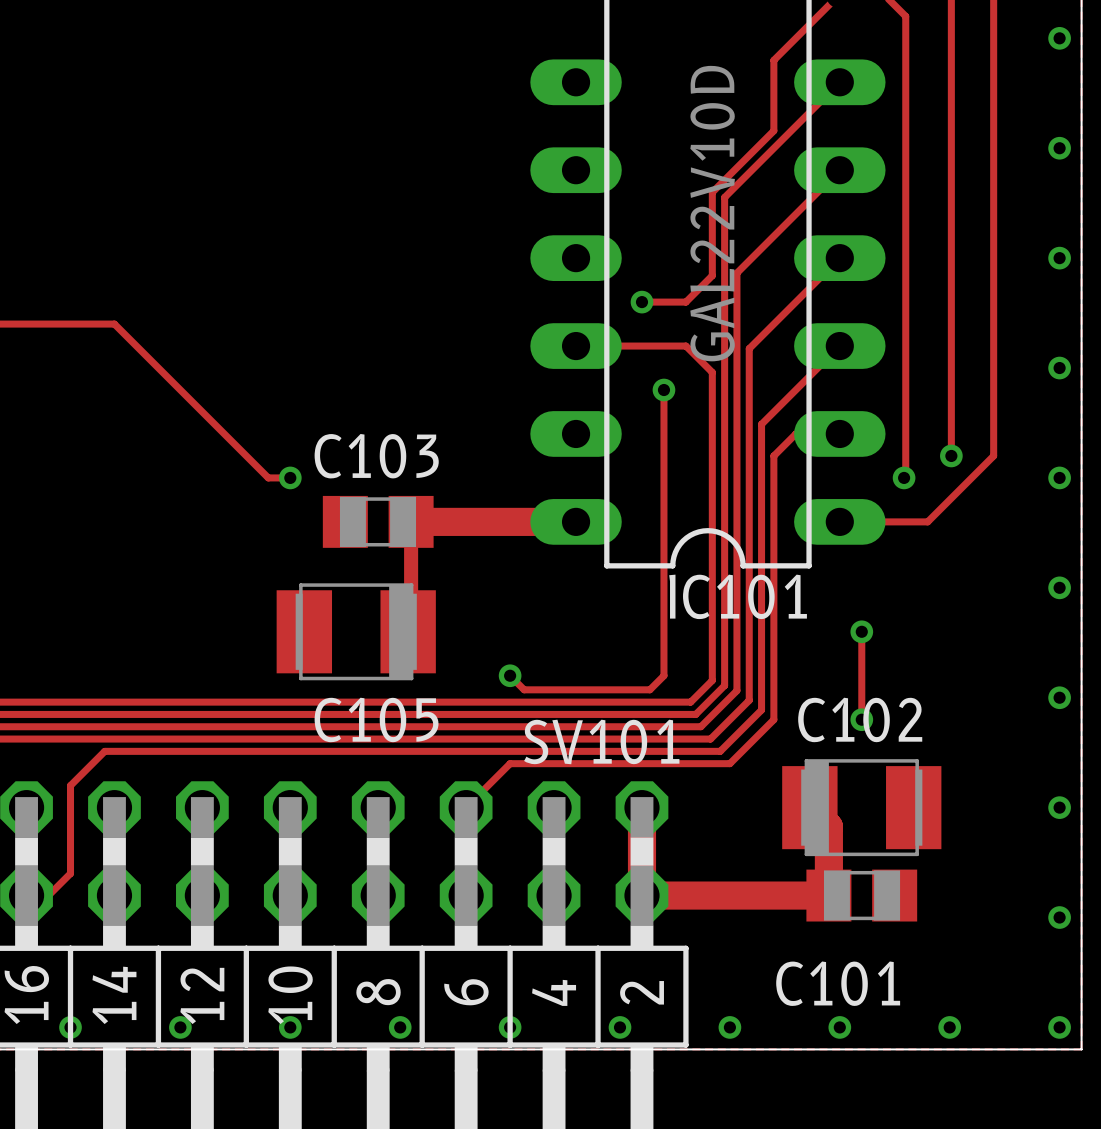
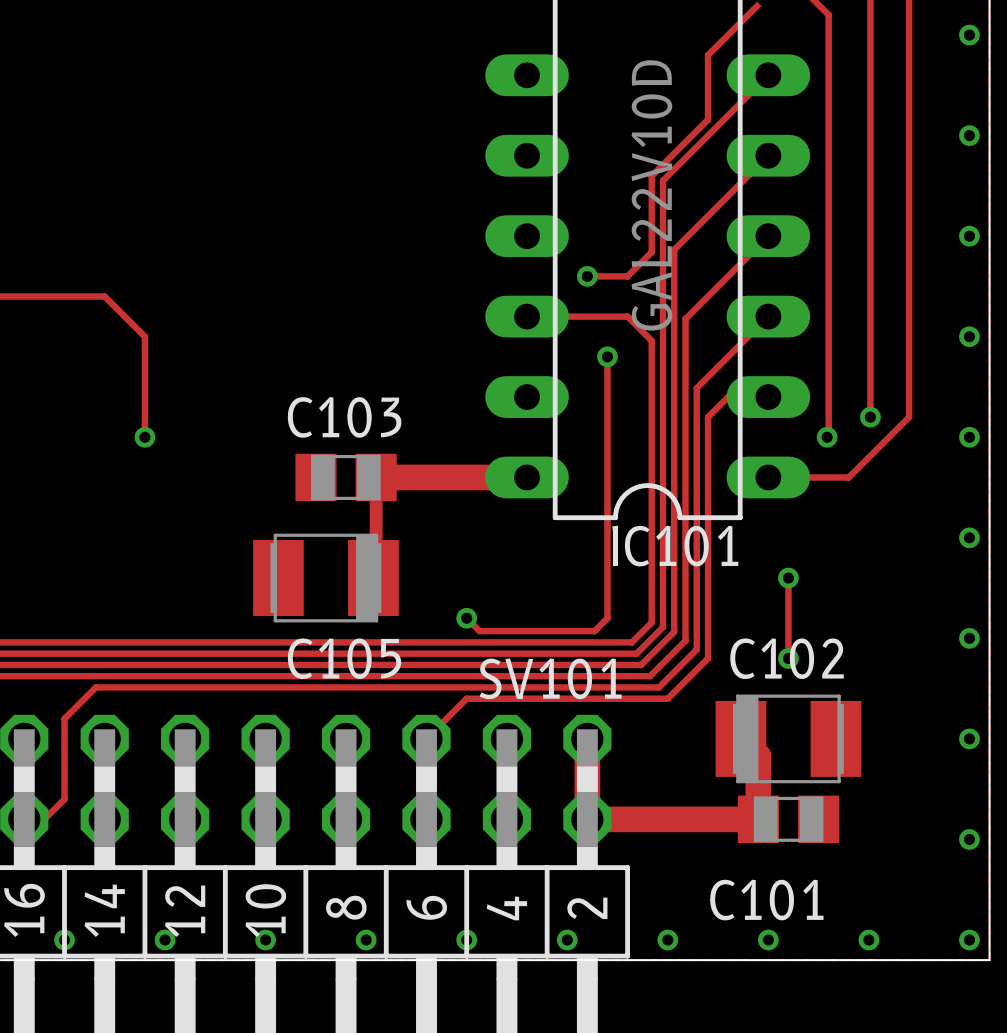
track: (158, 368) (268, 477) (290, 477) -> (144, 336) (144, 437)
via position: (290, 477) -> (144, 437)

